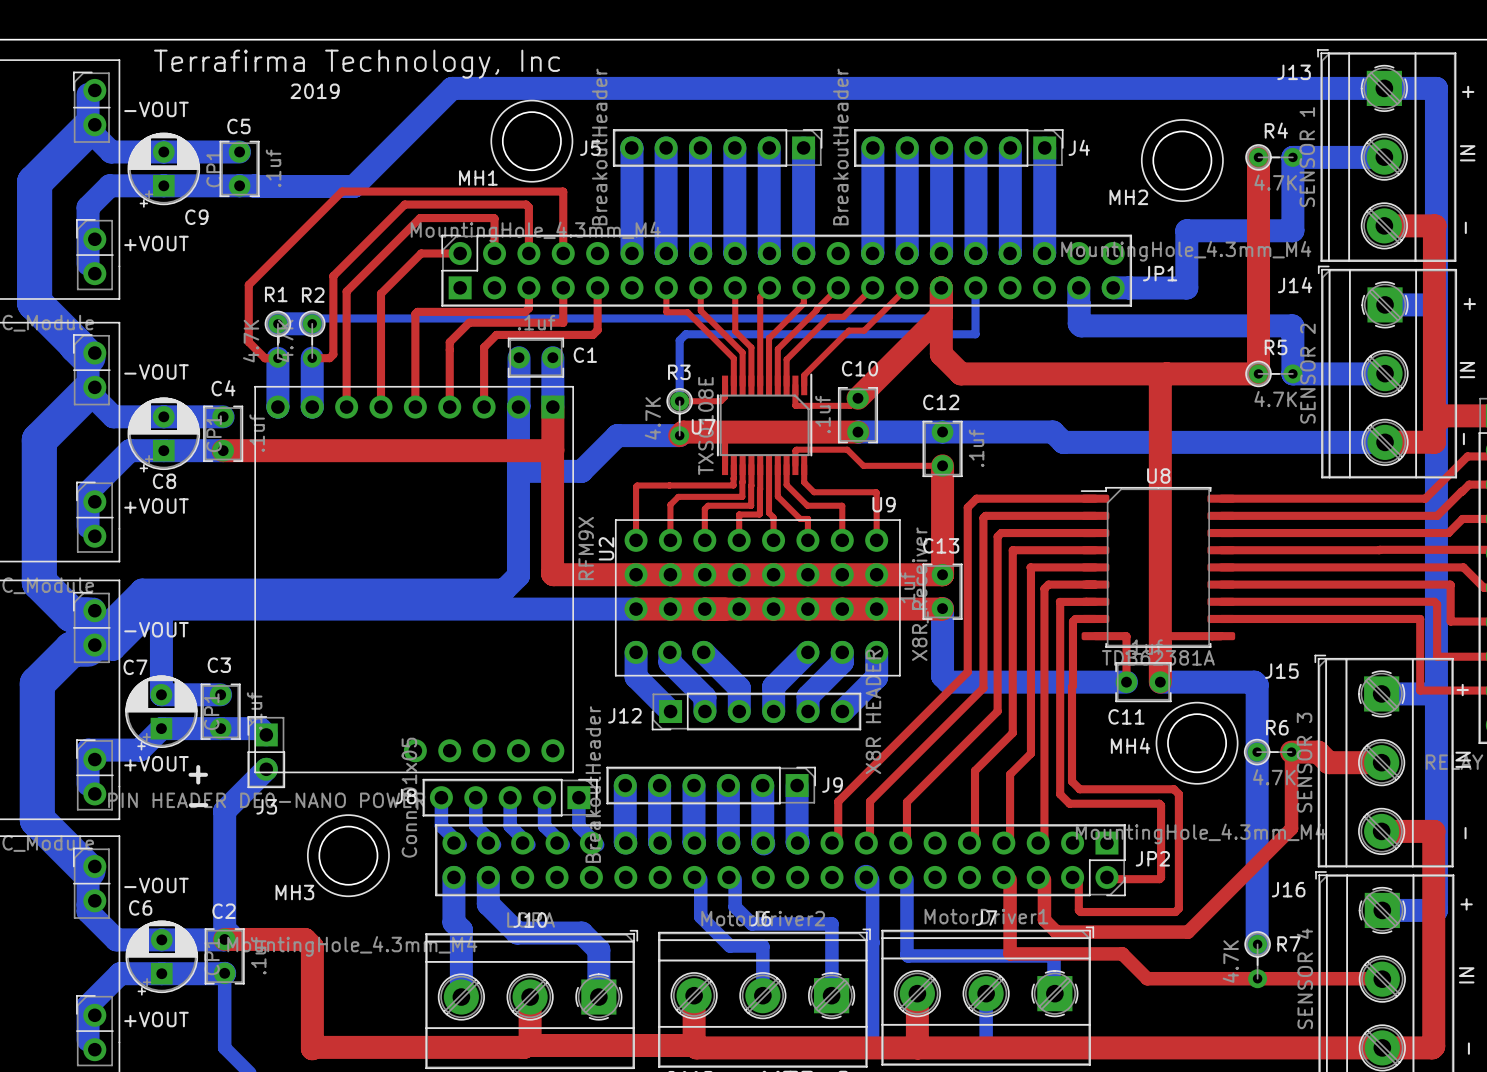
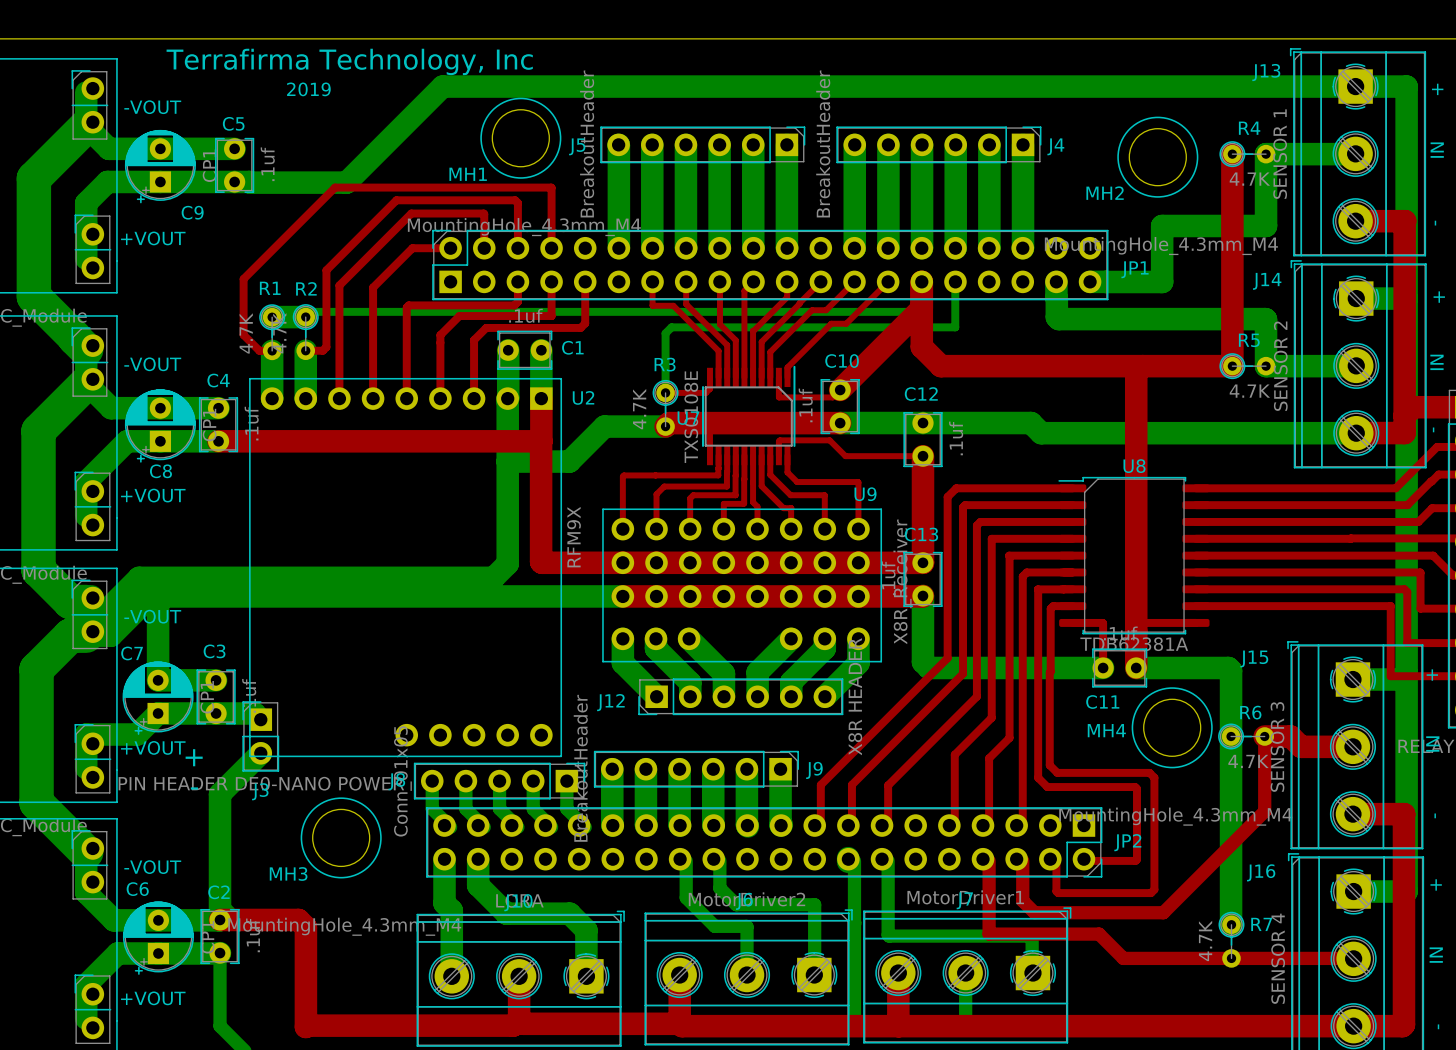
U2 name rotation: 0° (606, 548) -> 90° clockwise (583, 397)
U2 name position: U2 (606, 548) -> U2 (583, 397)

